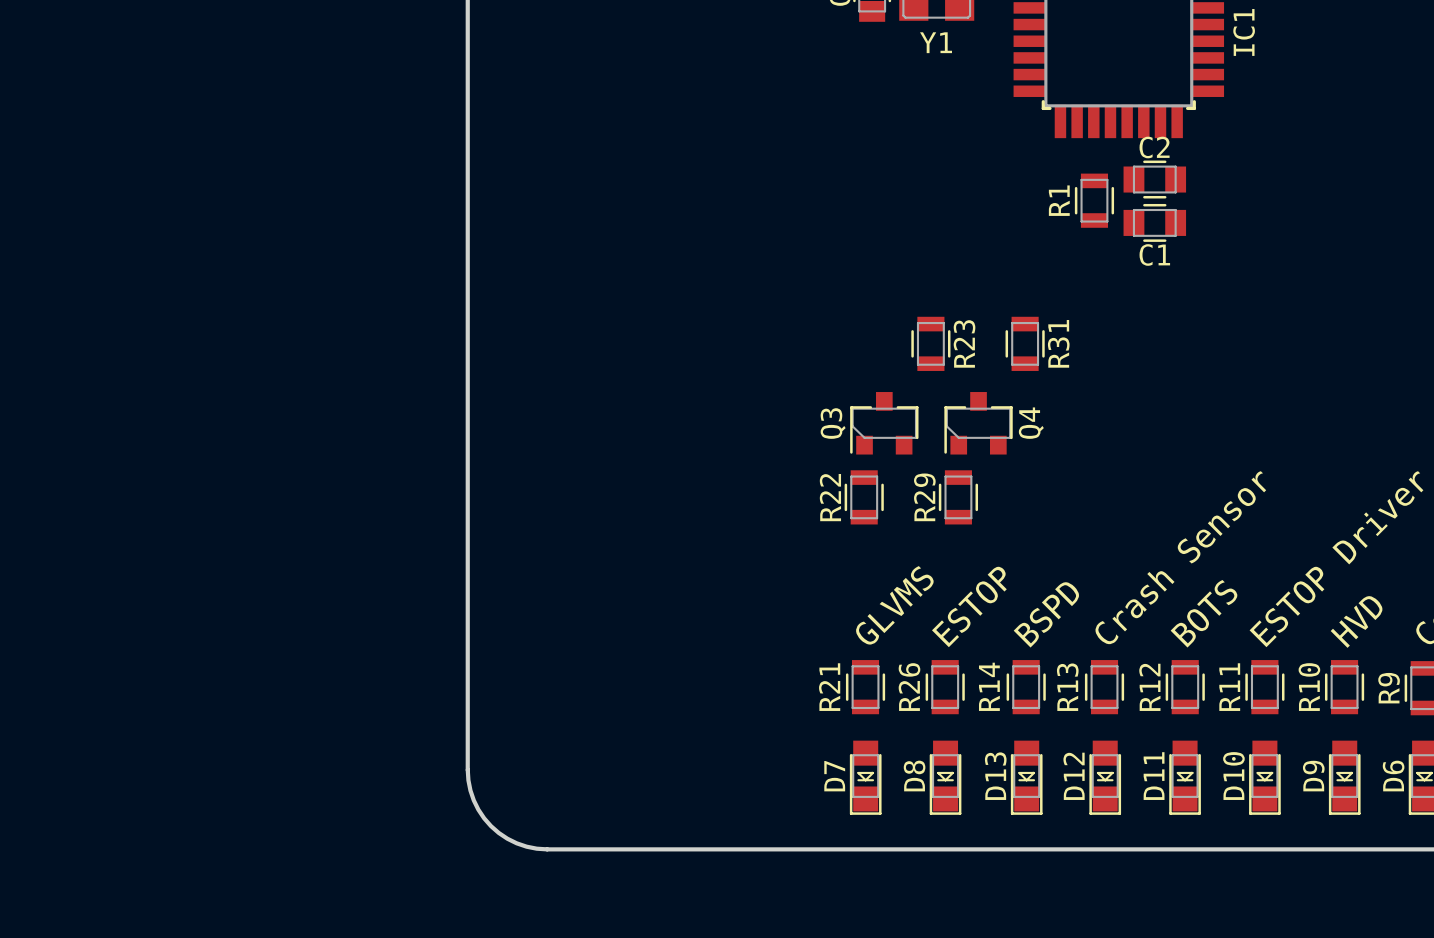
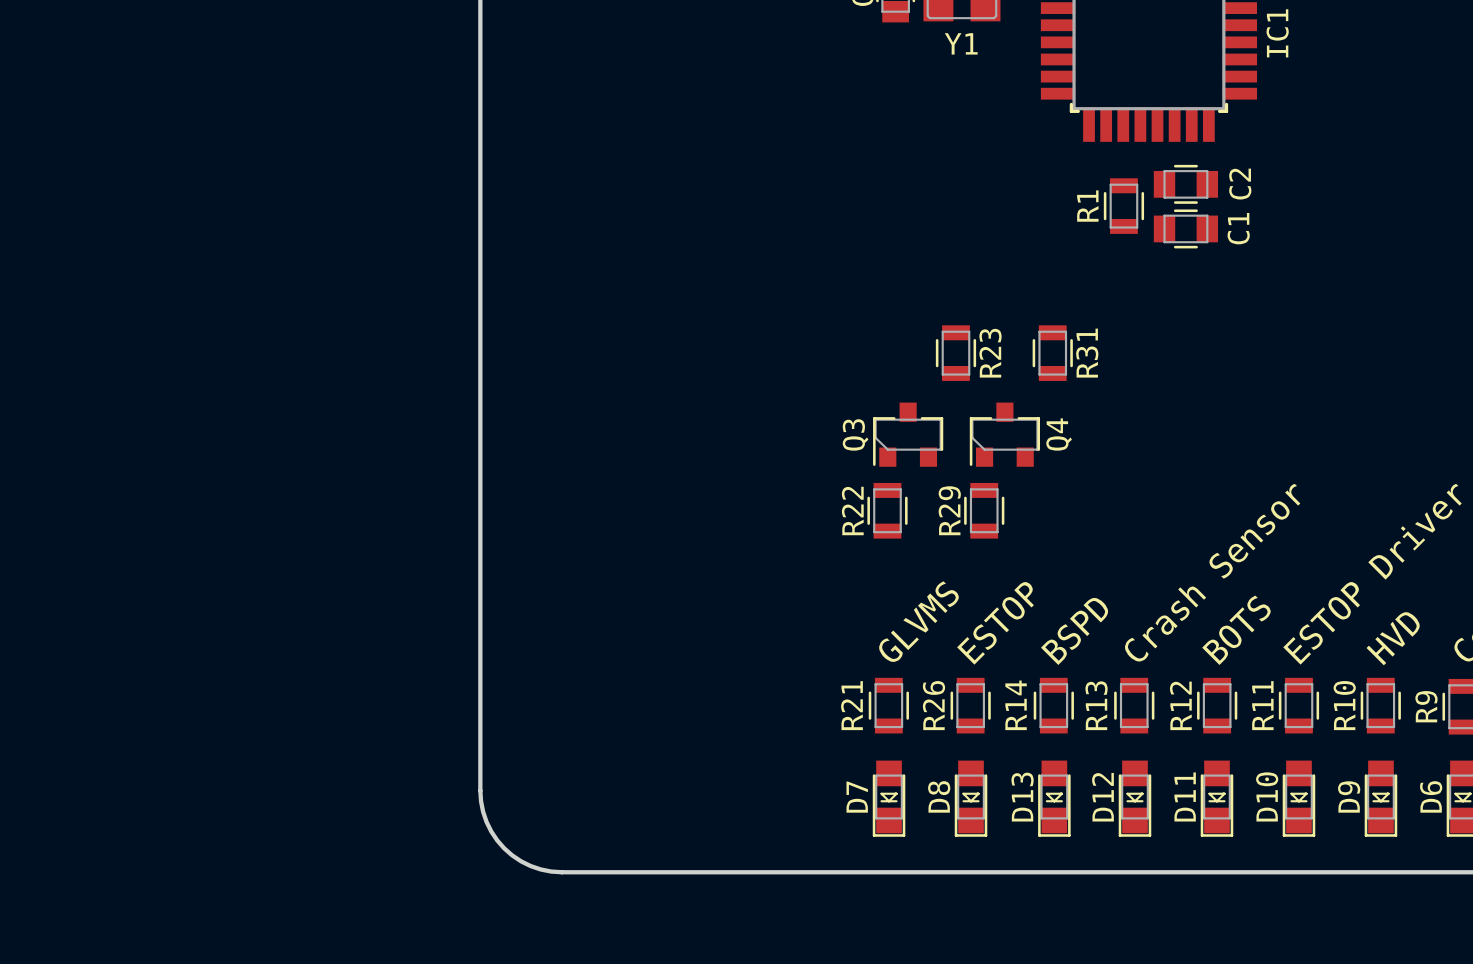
C2 name rotation: 0° (1154, 147) -> 90° counterclockwise (1240, 184)
C2 name position: C2 (1154, 147) -> C2 (1240, 184)
C1 name rotation: 0° (1154, 254) -> 90° counterclockwise (1238, 228)
C1 name position: C1 (1154, 254) -> C1 (1238, 228)

